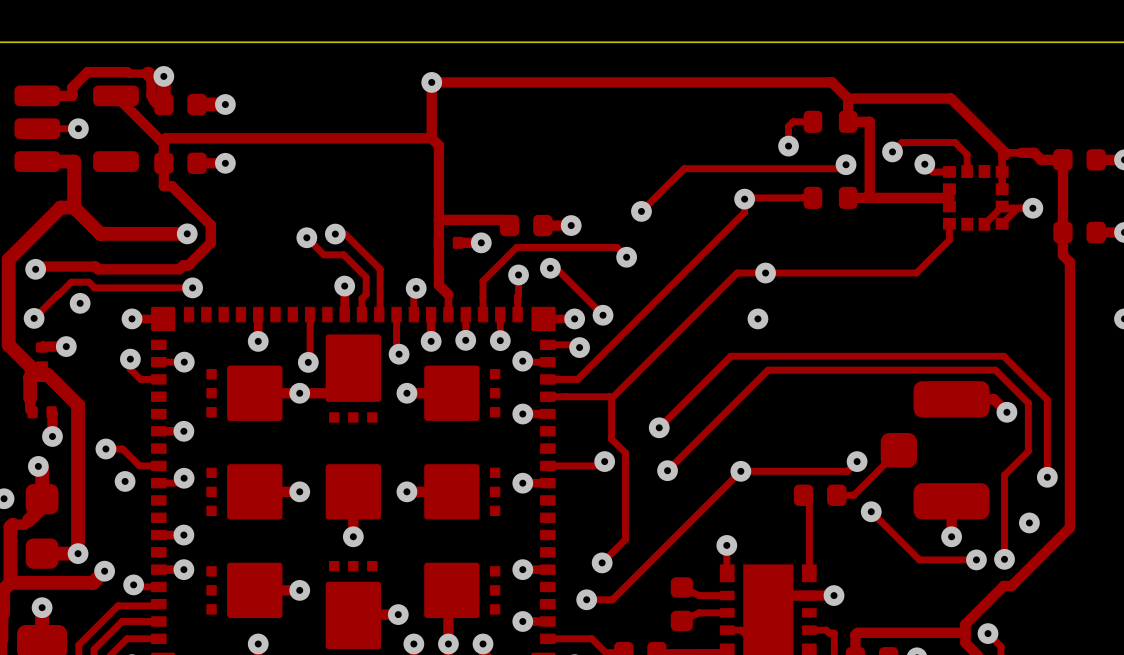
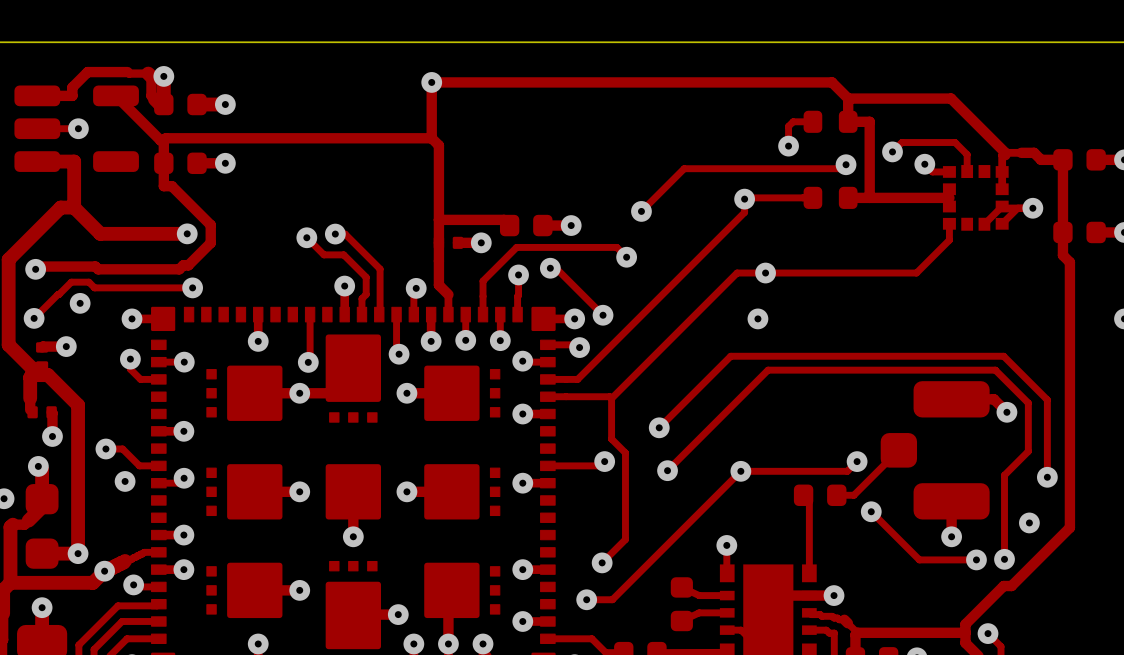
track: none -> (158, 552) (144, 552) (104, 571)
track: none -> (809, 612) (844, 619) (857, 632)

